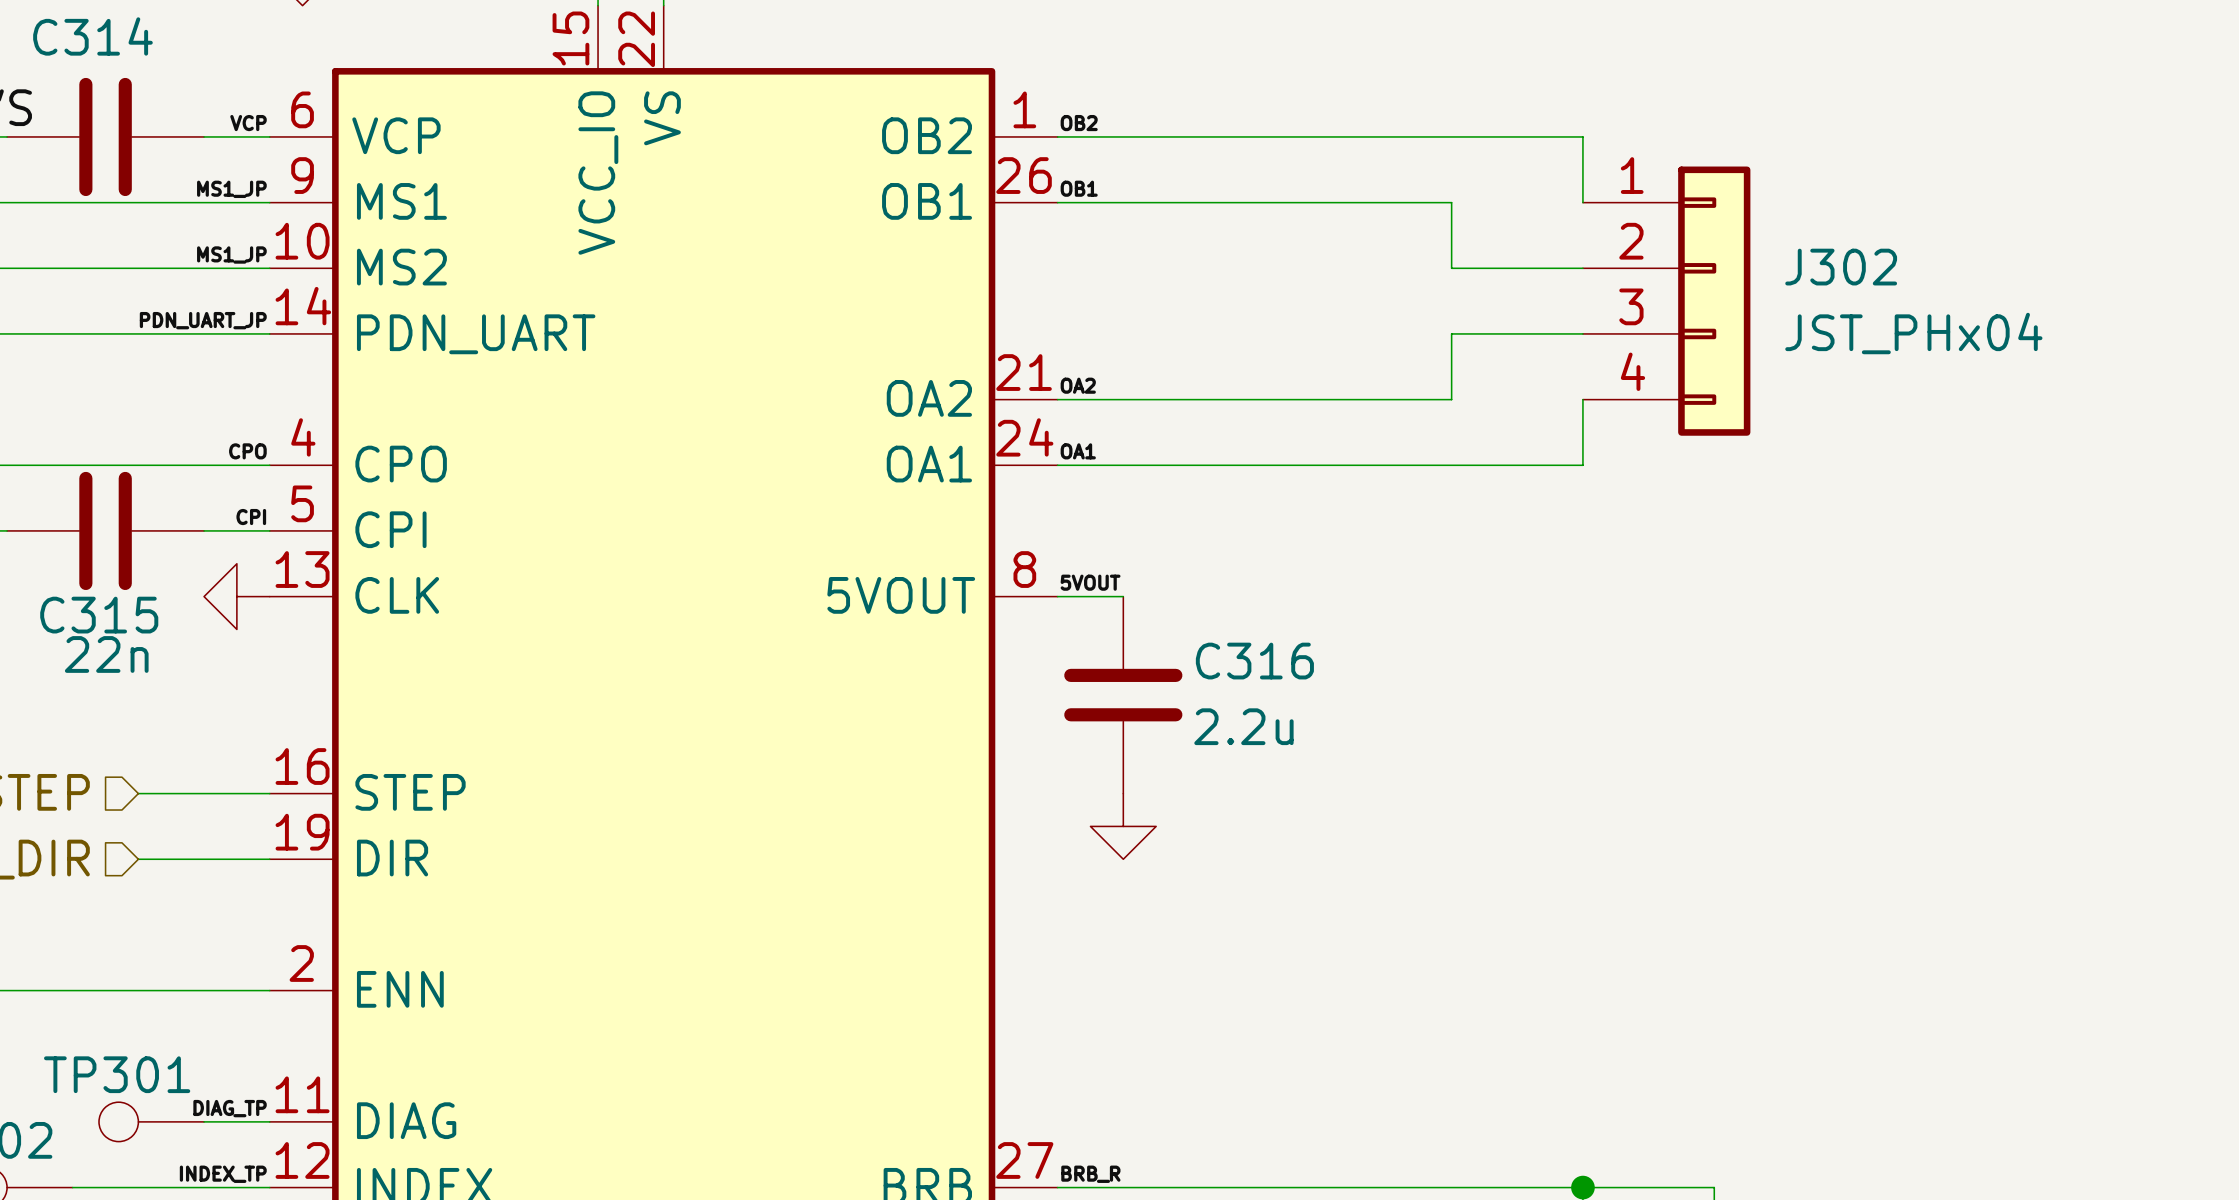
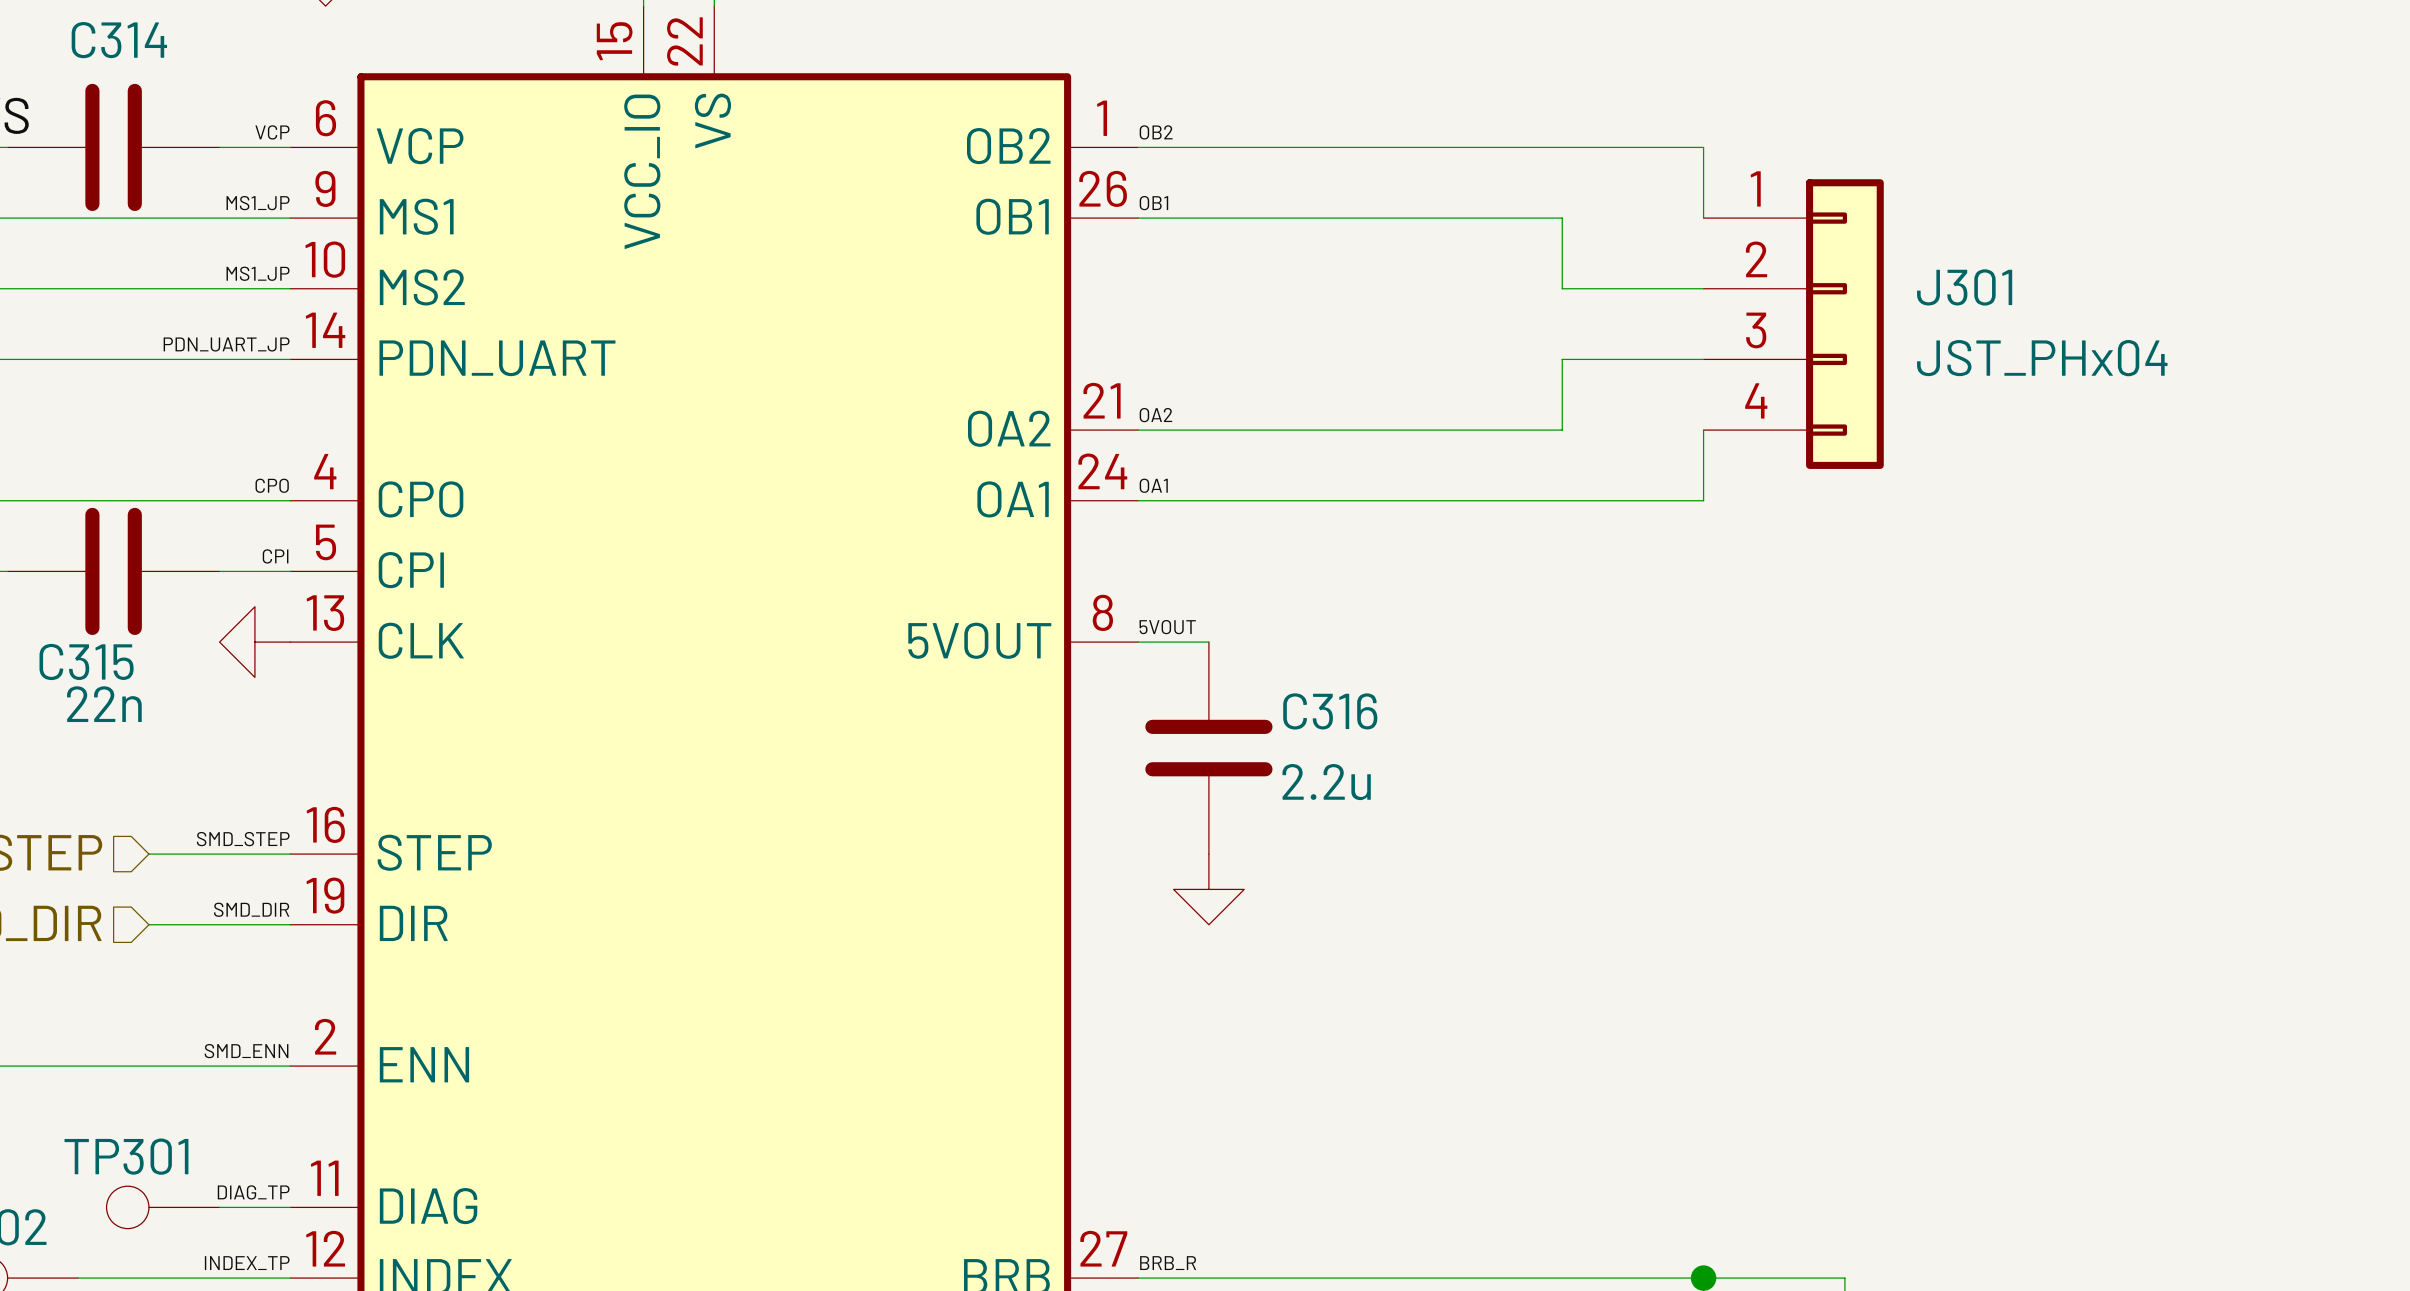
J302 name: J302 (1841, 267) -> J301 (1964, 287)
label: none -> SMD_STEP (243, 839)
label: none -> SMD_DIR (251, 909)
label: none -> SMD_ENN (246, 1051)

